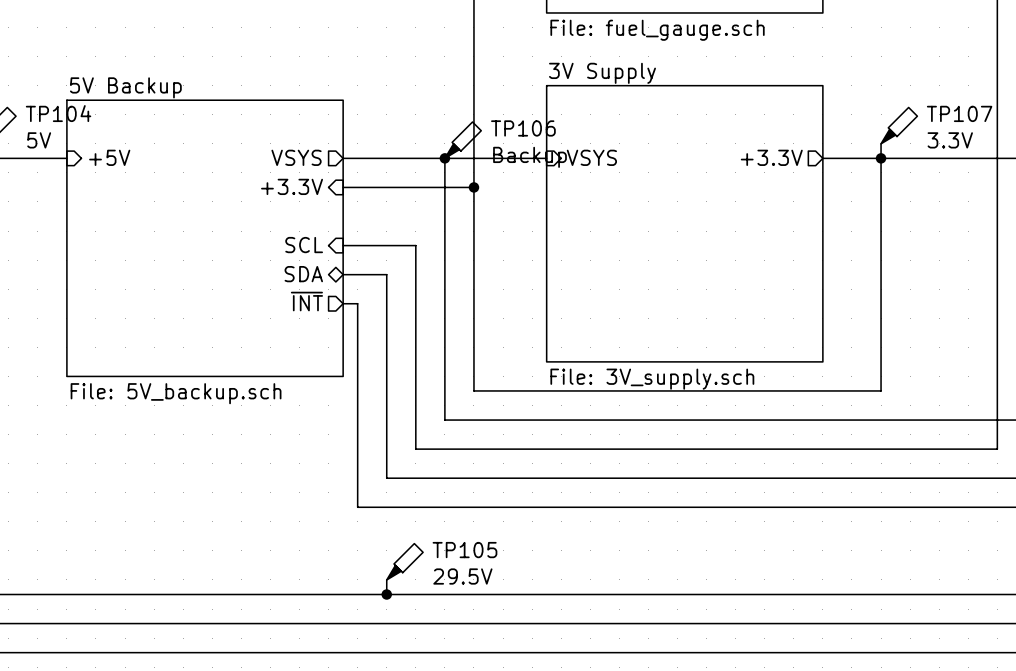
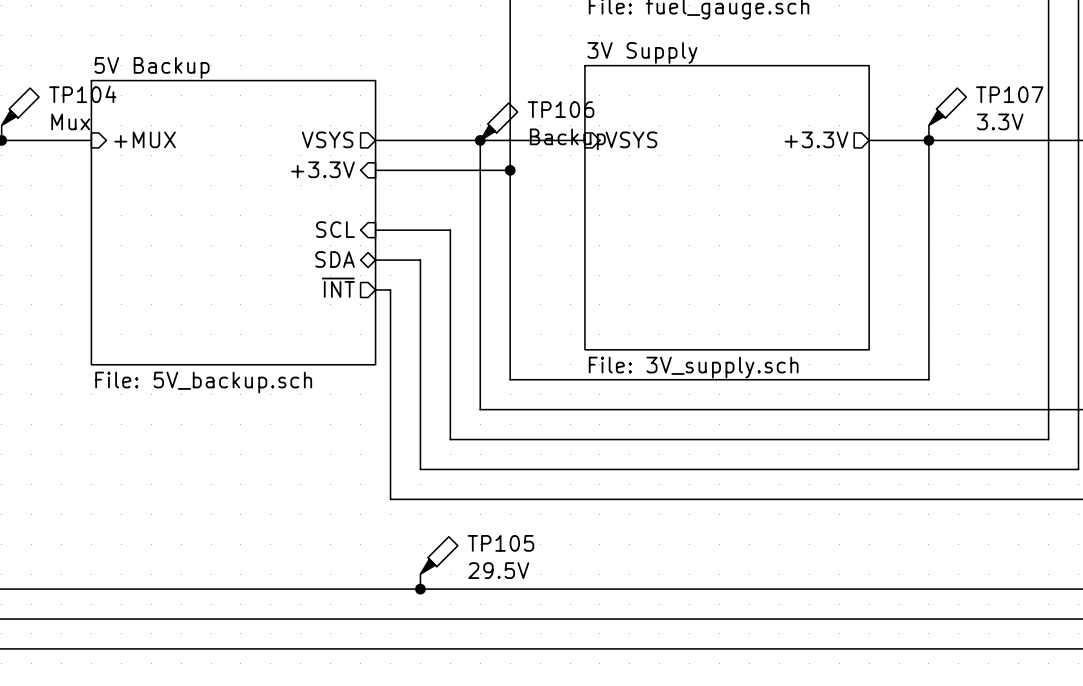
TP104 value: 5V (39, 140) -> Mux (70, 121)
sheet pin: +5V (109, 157) -> +MUX (145, 139)

